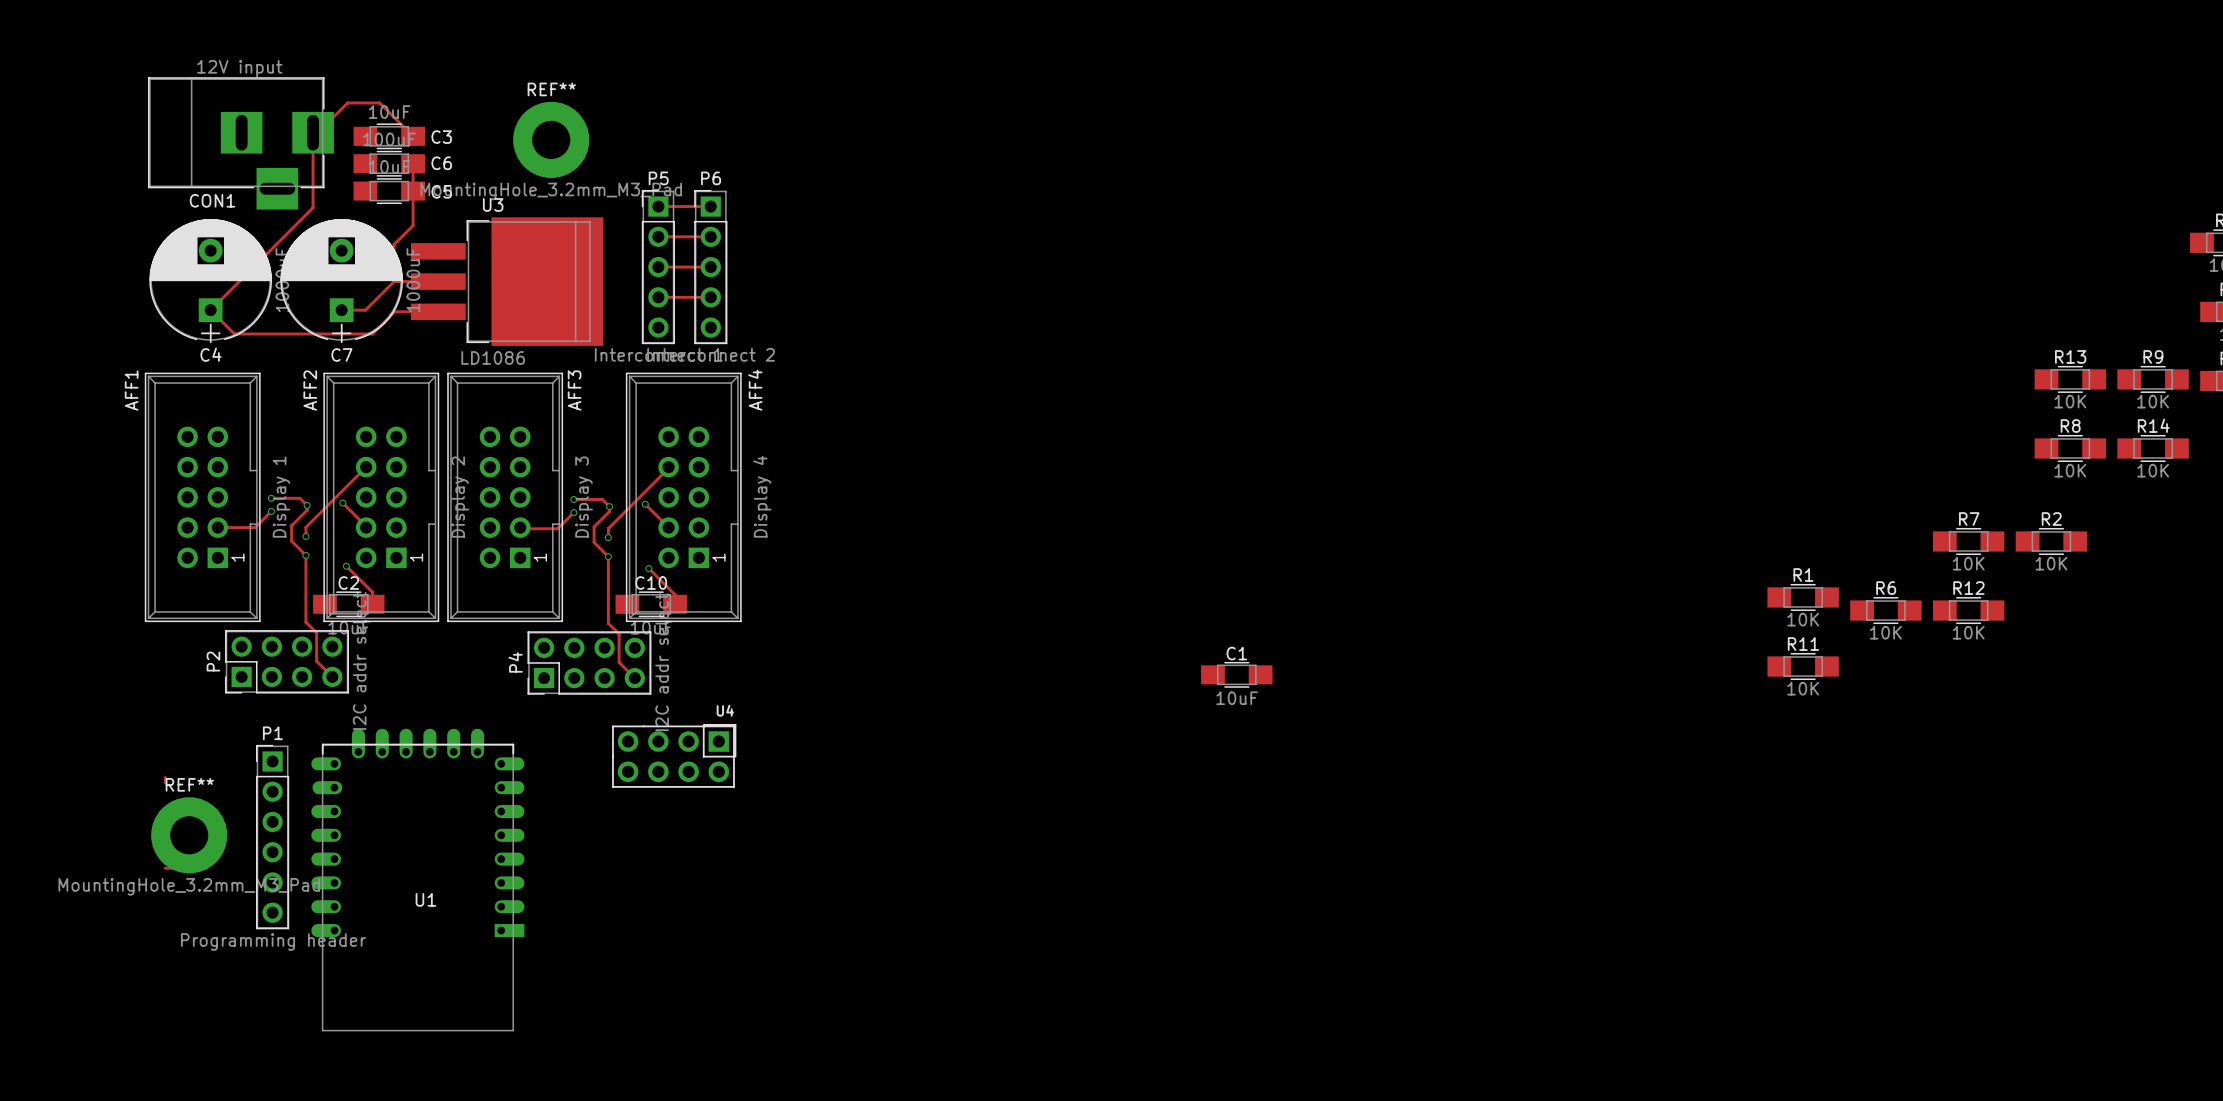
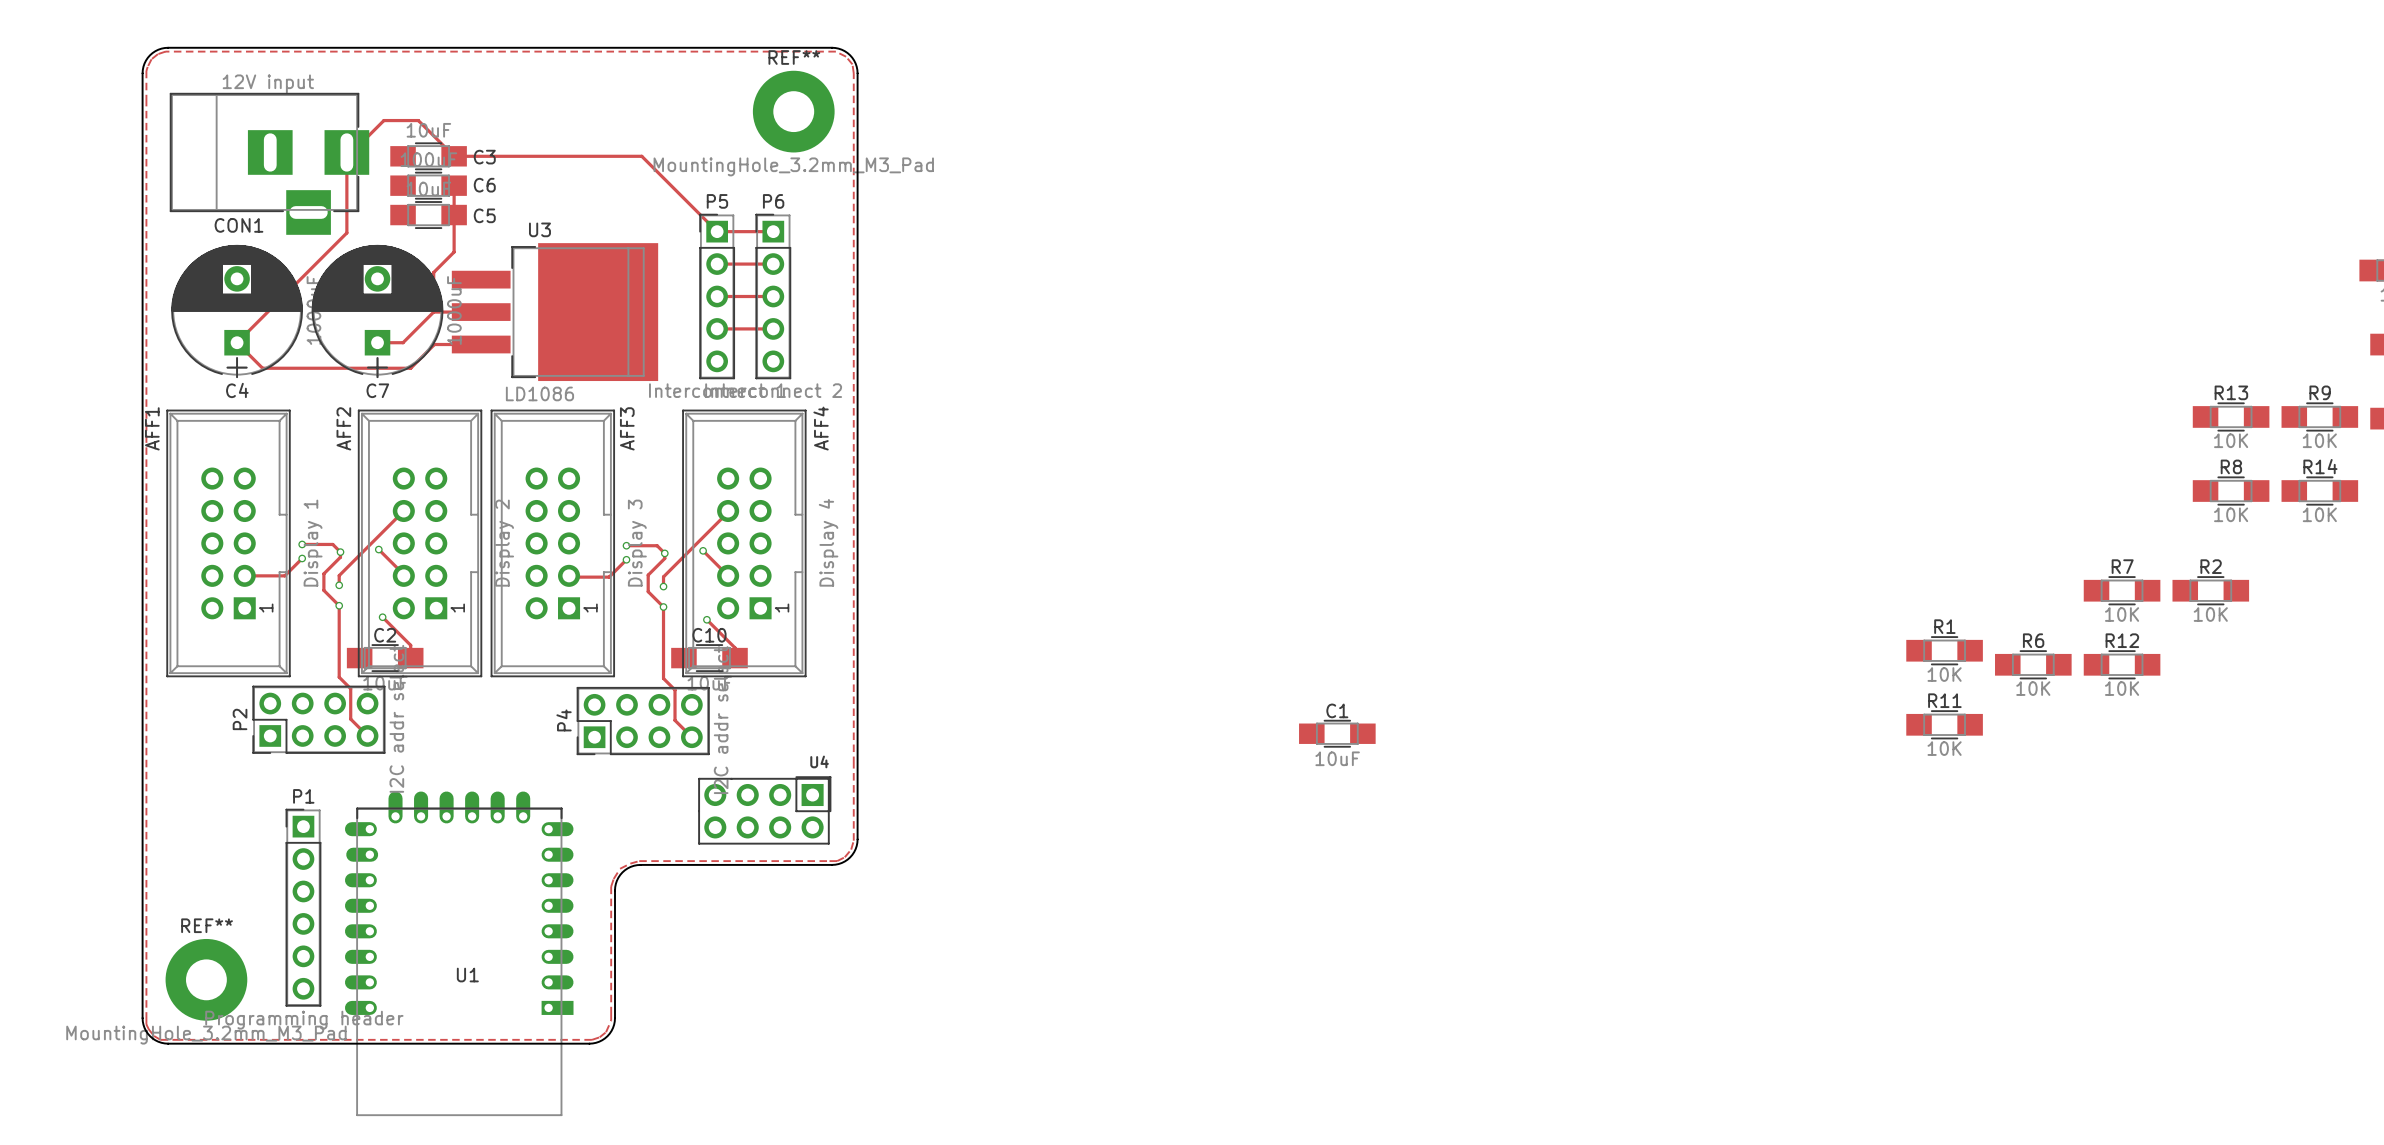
board edge: none -> (168, 47) (832, 47) (844, 51) (855, 63) (857, 73) (856, 845) (850, 857) (835, 864) (640, 864) (624, 870) (618, 877) (615, 887) (614, 1021) (609, 1033) (599, 1041) (589, 1043) (168, 1043) (152, 1038) (144, 1027) (142, 1018) (142, 73) (144, 63) (150, 55) (158, 49) (168, 47)
zone outline: none -> (165, 51) (835, 51) (846, 56) (852, 64) (853, 840) (851, 849) (844, 857) (837, 861) (639, 861) (620, 868) (611, 886) (611, 1020) (606, 1032) (599, 1037) (592, 1039) (160, 1039) (154, 1036) (146, 1024) (146, 70) (151, 59) (165, 51)
track: none -> (454, 156) (641, 156) (717, 231)
REF** position: (551, 139) -> (793, 111)
U4 position: (674, 755) -> (764, 810)
track: (165, 777) (165, 782) -> none
REF** position: (189, 835) -> (206, 979)
track: (165, 868) (173, 868) -> none

